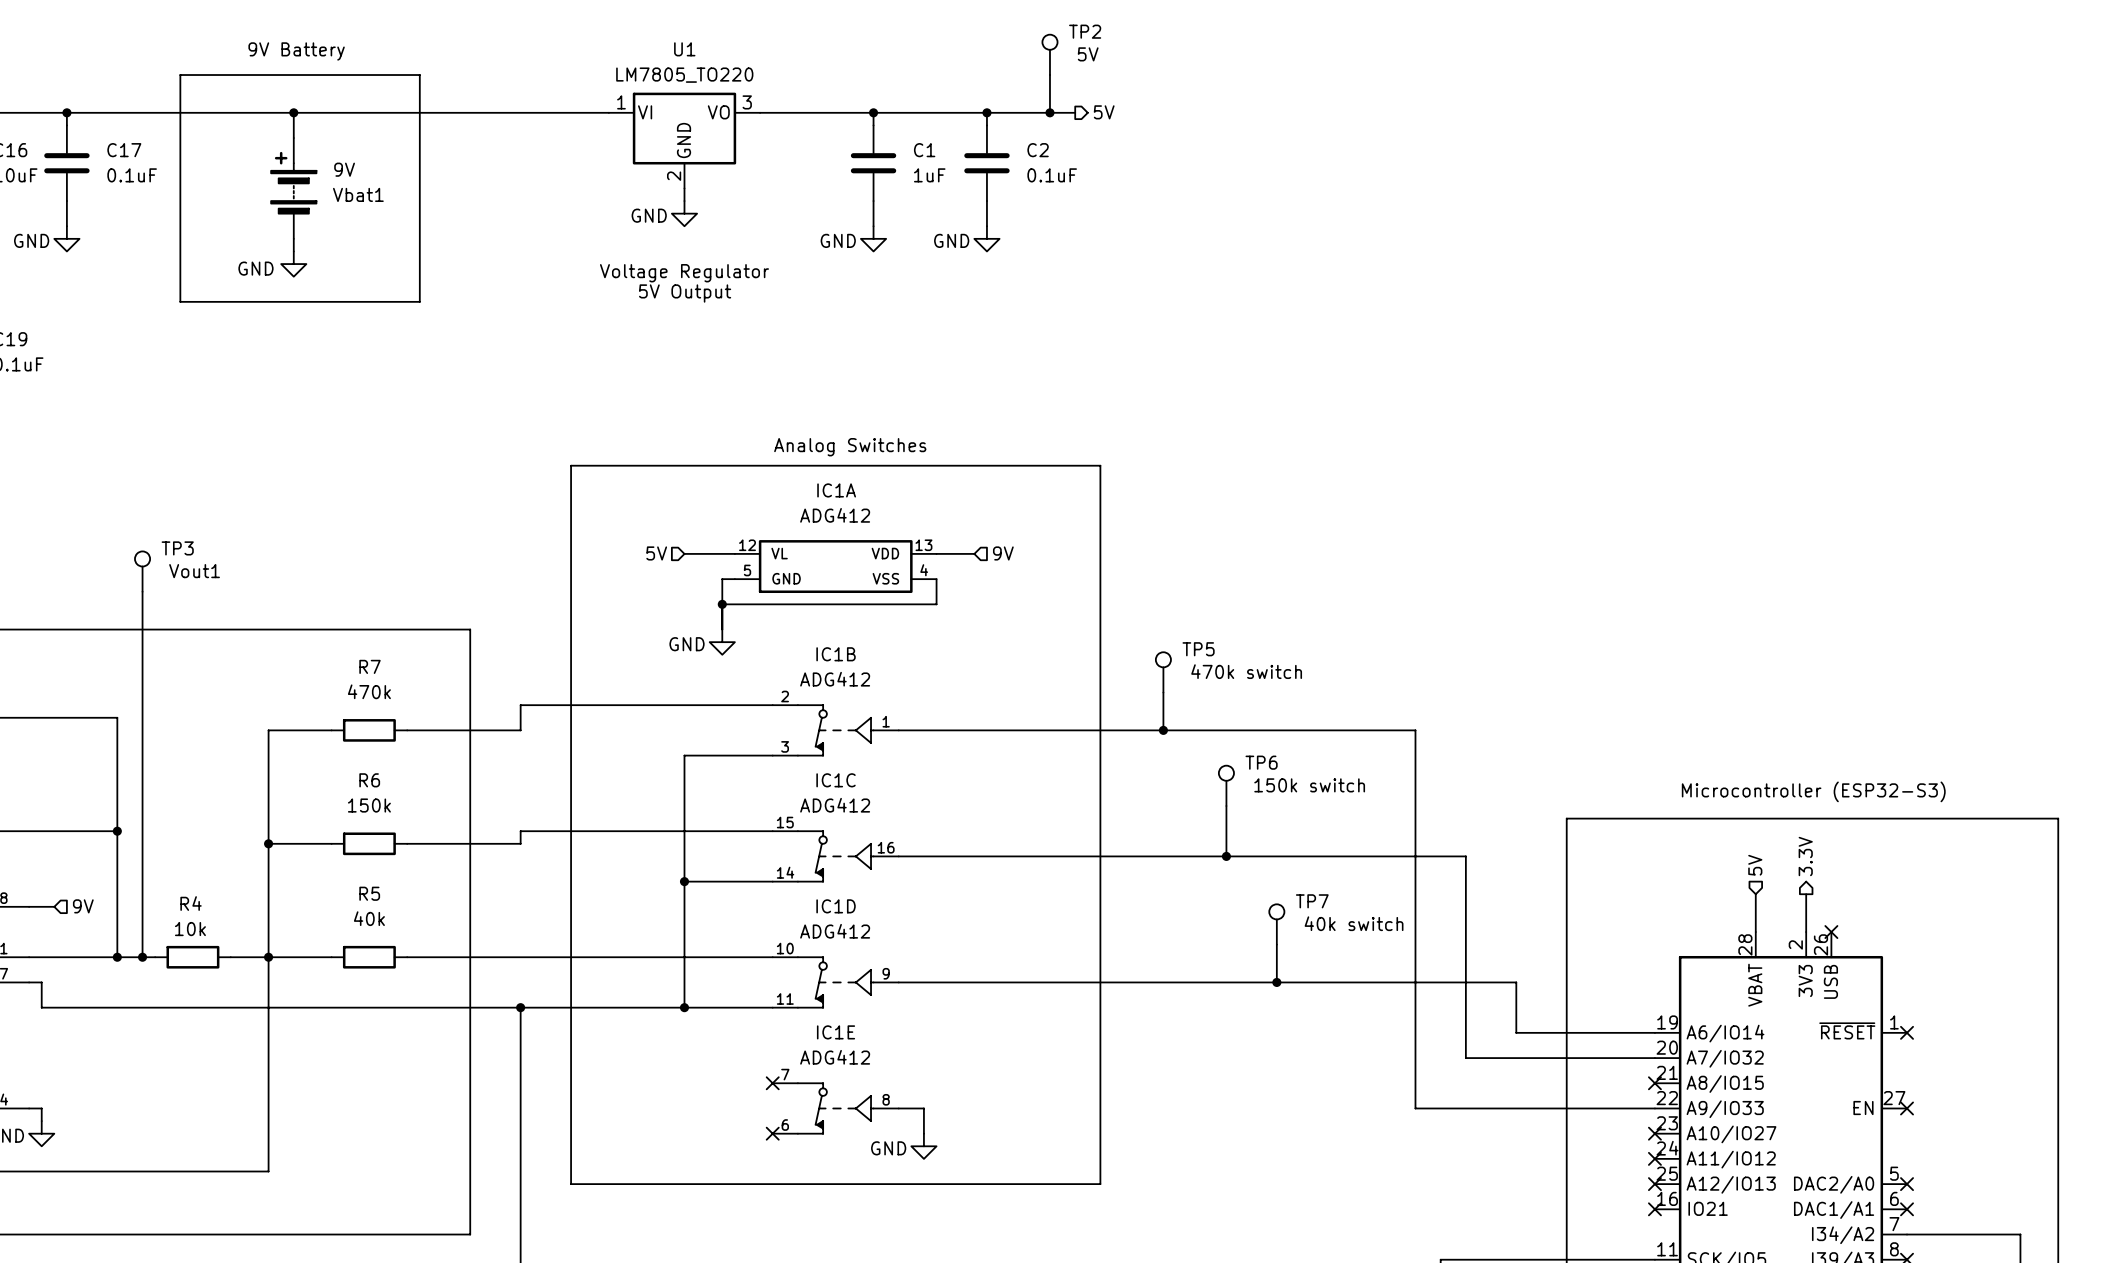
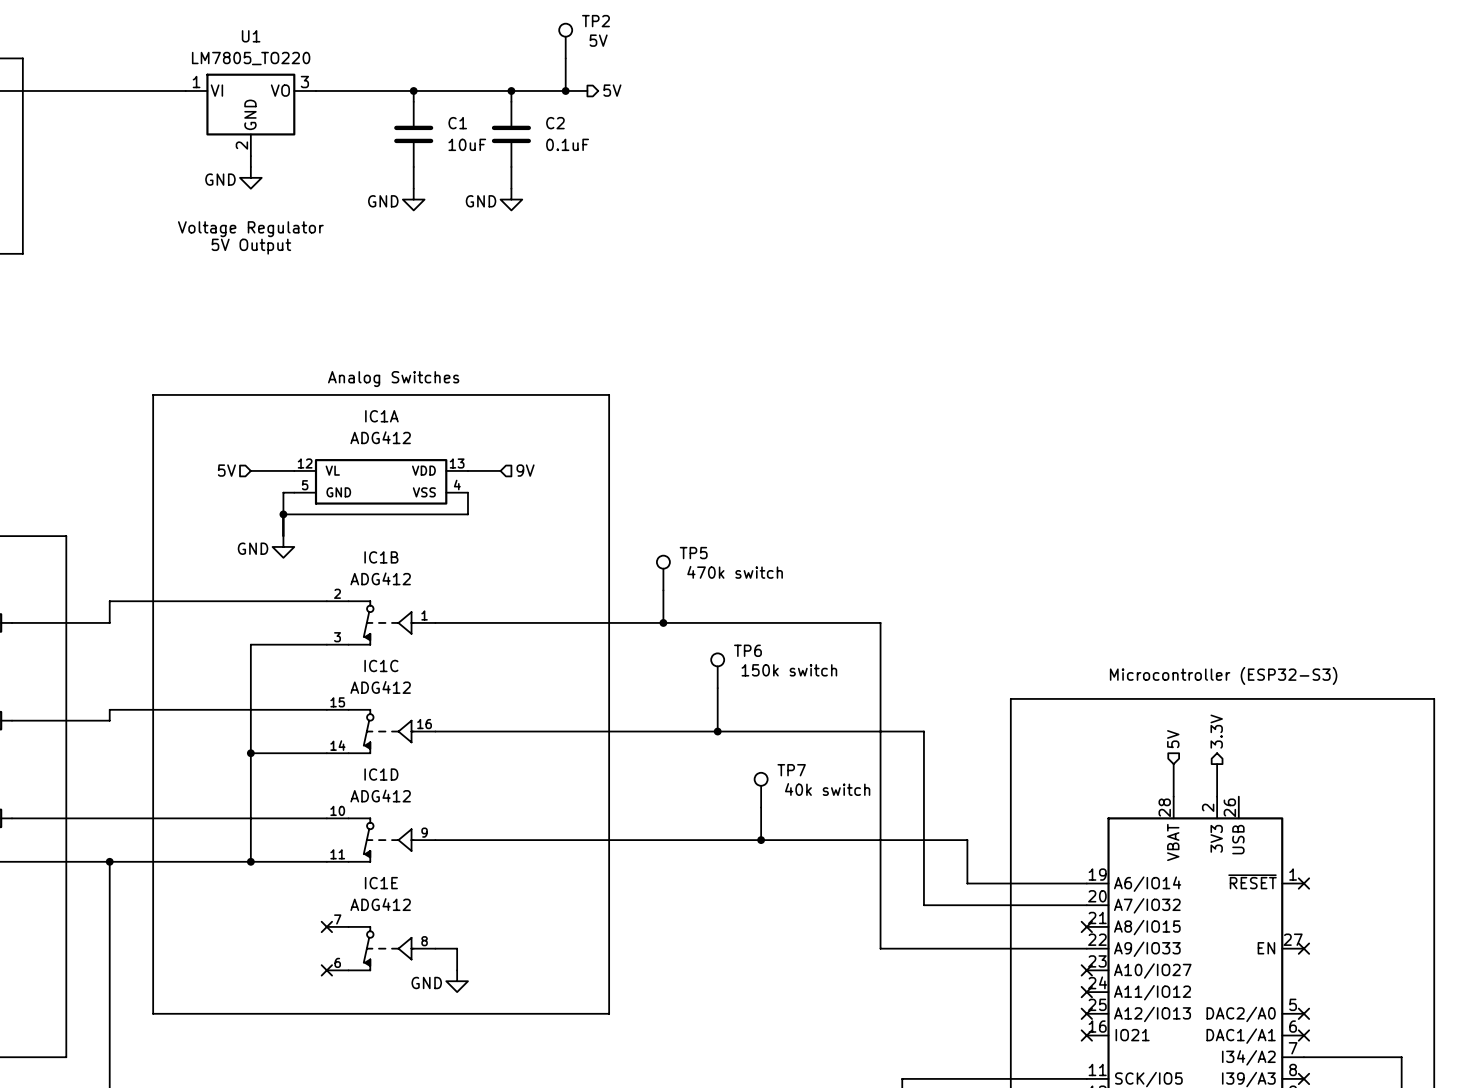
C1 value: 1uF (929, 175) -> 10uF (467, 144)
no-connect mark: (1831, 932) -> none

